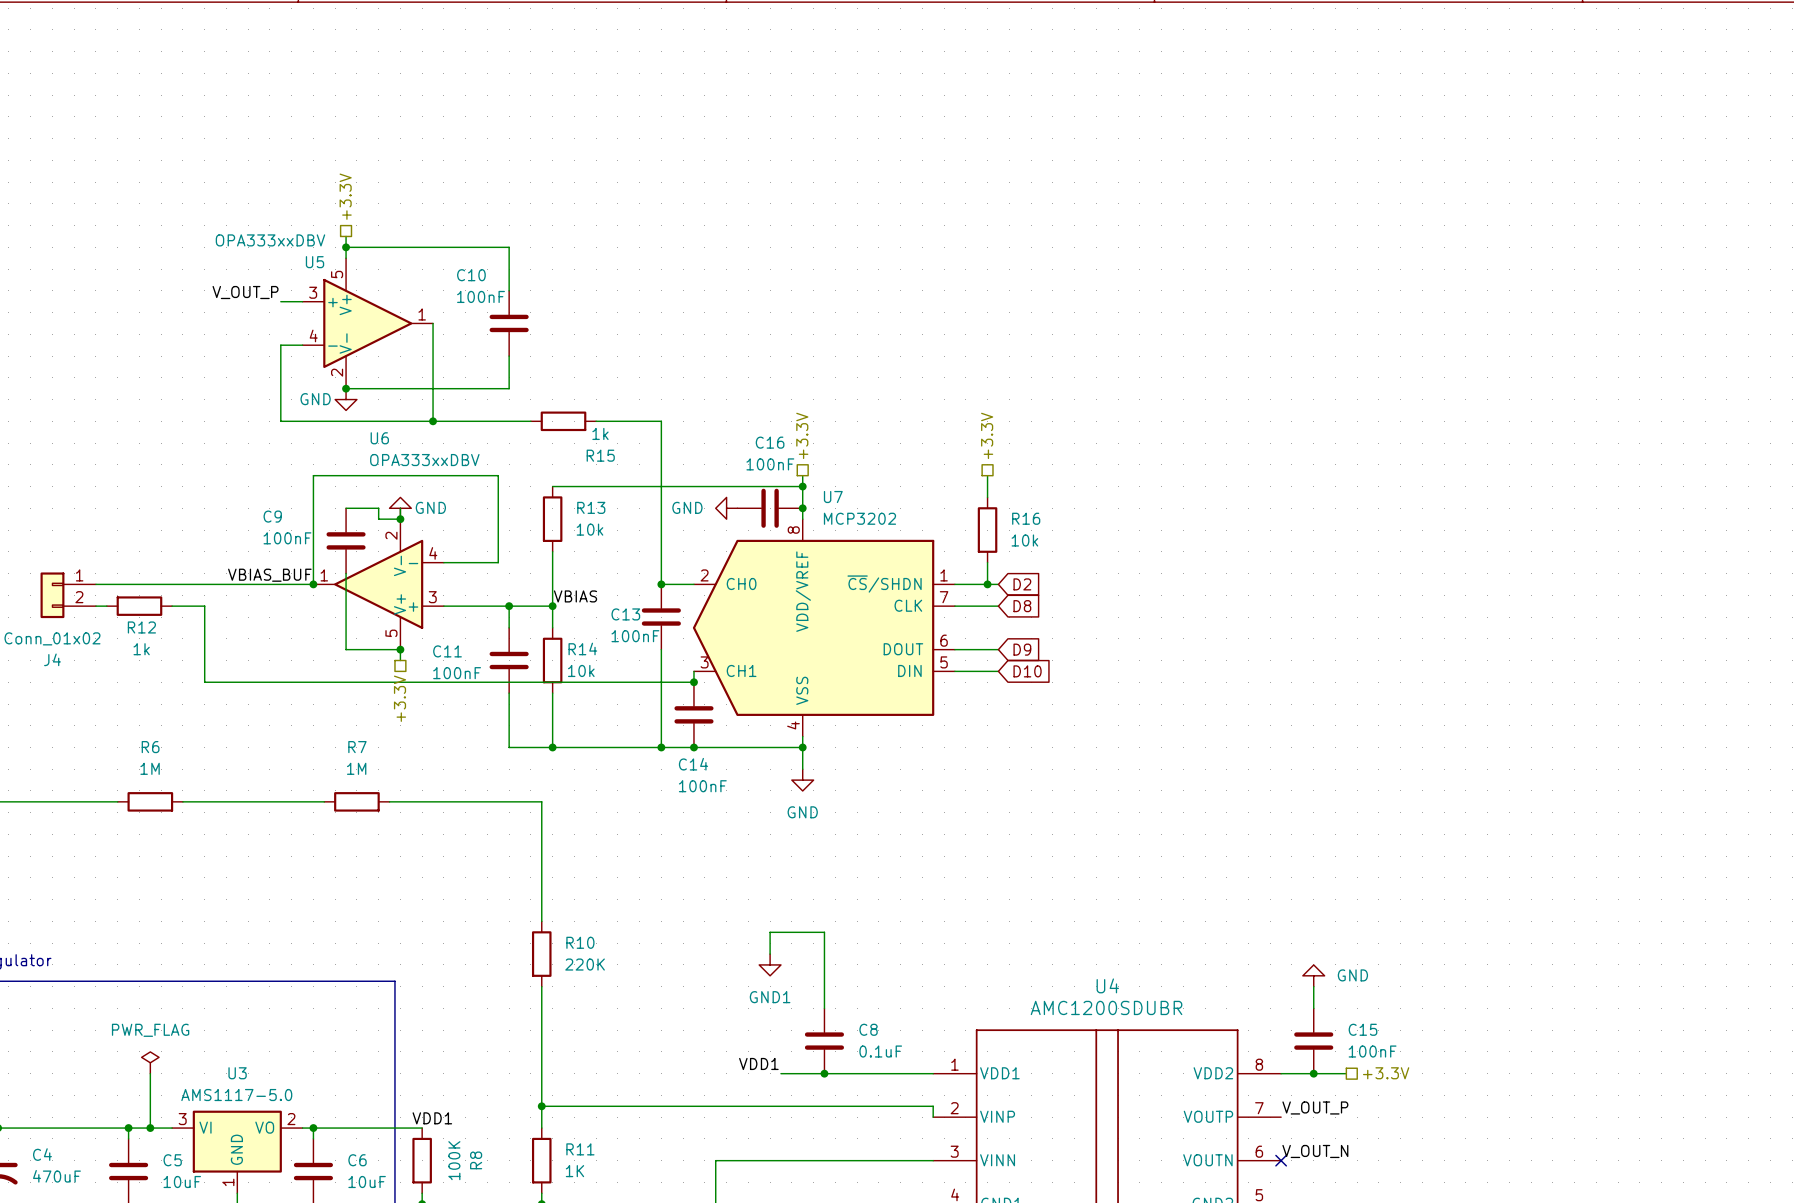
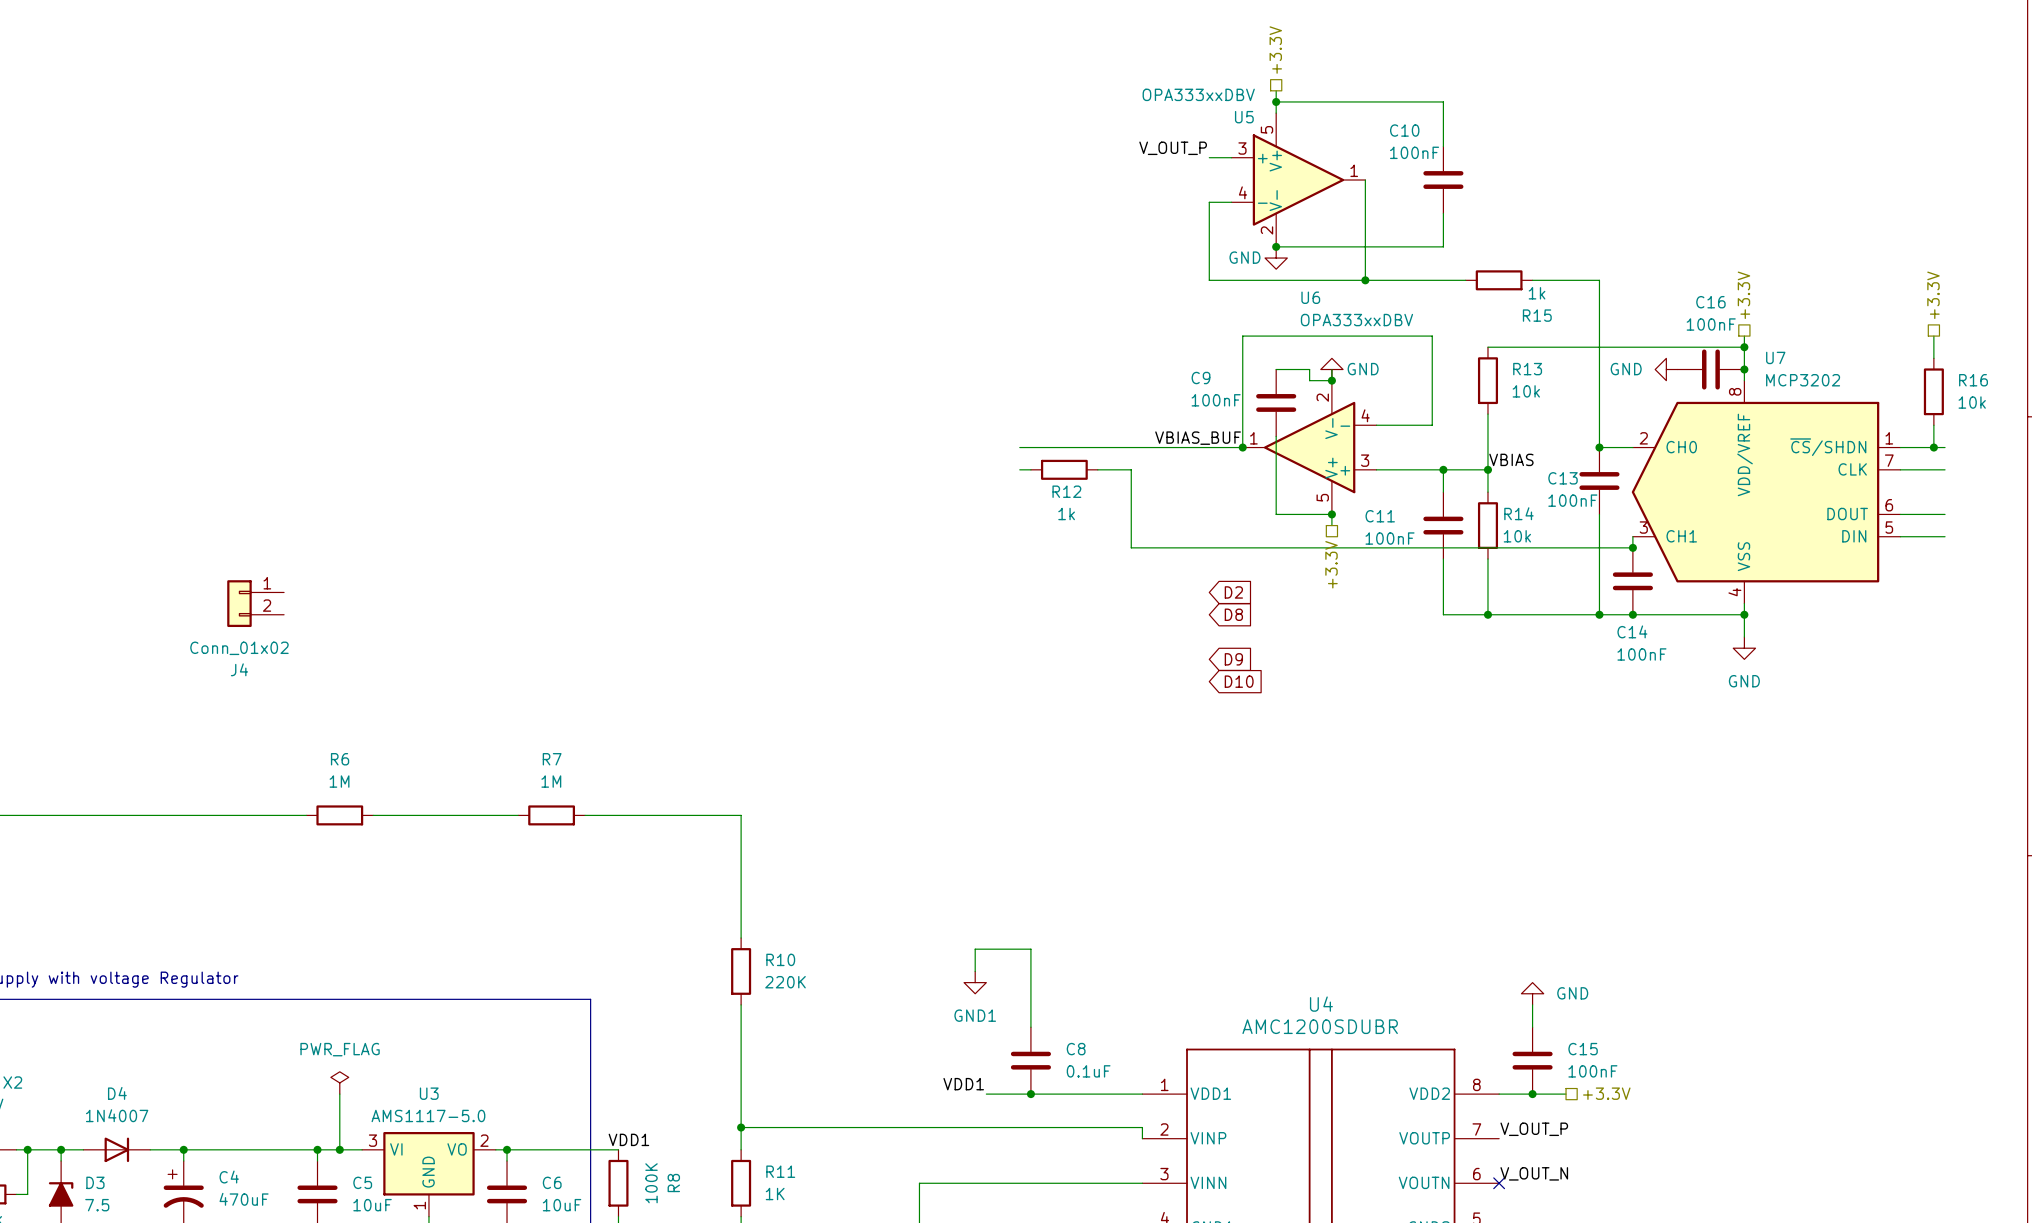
hierarchical label: none -> +3.3V (1275, 50)
wire: none -> (1276, 90) (1276, 113)
wire: none -> (1276, 101) (1443, 101) (1443, 146)
junction: none -> (1276, 101)
label: none -> V_OUT_P (1173, 148)
wire: none -> (1209, 157) (1231, 157)
wire: none -> (1365, 180) (1365, 280)
hierarchical label: +3.3V (345, 196) -> none
wire: none -> (1231, 202) (1209, 202) (1209, 280) (1465, 280)
wire: none -> (1443, 213) (1443, 246) (1276, 246)
wire: (346, 236) (346, 258) -> none
wire: (346, 247) (509, 247) (509, 290) -> none
junction: (346, 247) -> none
junction: none -> (1276, 246)
power symbol: none -> GND (1276, 258)
junction: none -> (1365, 280)
wire: none -> (1532, 280) (1599, 280) (1599, 447) (1632, 447)
label: V_OUT_P (245, 292) -> none
hierarchical label: none -> +3.3V (1743, 295)
hierarchical label: none -> +3.3V (1933, 295)
wire: (280, 301) (302, 301) -> none
U5 position: (367, 323) -> (1298, 180)
wire: (433, 323) (433, 421) -> none
C10 position: (509, 323) -> (1443, 180)
wire: none -> (1744, 336) (1744, 380)
wire: none -> (1933, 336) (1933, 358)
wire: (302, 345) (280, 345) (280, 421) (530, 421) -> none
wire: none -> (1487, 347) (1744, 347)
junction: none -> (1744, 347)
wire: (509, 356) (509, 388) (346, 388) -> none
wire: none -> (1276, 369) (1309, 369) (1309, 380) (1331, 380) (1331, 369)
power symbol: none -> GND (1331, 369)
power symbol: none -> GND (1666, 369)
junction: none -> (1744, 369)
junction: none -> (1331, 380)
junction: (346, 388) -> none
power symbol: GND (346, 399) -> none
wire: none -> (1487, 414) (1487, 492)
junction: (433, 421) -> none
R15 position: (563, 421) -> (1499, 280)
wire: (596, 421) (661, 421) (661, 584) (693, 584) -> none
wire: none -> (1376, 425) (1432, 425) (1432, 336) (1242, 336) (1242, 447) (1019, 447)
wire: none -> (1933, 425) (1933, 447)
wire: none -> (1276, 436) (1276, 514) (1331, 514) (1331, 525)
label: none -> VBIAS_BUF (1198, 438)
hierarchical label: +3.3V (802, 435) -> none
hierarchical label rotation: 0° (987, 435) -> 180° (1331, 564)
hierarchical label position: +3.3V (987, 435) -> +3.3V (1331, 564)
junction: none -> (1242, 447)
junction: none -> (1599, 447)
wire: none -> (1900, 447) (1945, 447)
junction: none -> (1933, 447)
label: none -> VBIAS (1511, 459)
wire: none -> (1019, 469) (1030, 469)
wire: none -> (1097, 469) (1131, 469) (1131, 547) (1632, 547) (1632, 536)
wire: none -> (1376, 469) (1487, 469)
wire: none -> (1443, 469) (1443, 492)
junction: none -> (1443, 469)
junction: none -> (1487, 469)
wire: none -> (1900, 469) (1945, 469)
wire: (802, 475) (802, 519) -> none
wire: (987, 475) (987, 497) -> none
wire: (552, 486) (802, 486) -> none
junction: (802, 486) -> none
wire: (346, 508) (378, 508) (378, 519) (400, 519) (400, 508) -> none
power symbol: GND (400, 508) -> none
power symbol: GND (726, 508) -> none
C16 position: (770, 508) -> (1710, 369)
junction: (802, 508) -> none
junction: none -> (1331, 514)
wire: none -> (1599, 514) (1599, 614)
wire: none -> (1900, 514) (1945, 514)
junction: (400, 519) -> none
R13 position: (552, 519) -> (1487, 380)
R16 position: (987, 530) -> (1933, 391)
wire: none -> (1900, 536) (1945, 536)
C9 position: (346, 540) -> (1276, 402)
junction: none -> (1632, 547)
wire: (552, 551) (552, 627) -> none
wire: none -> (1443, 559) (1443, 614) (1744, 614)
wire: none -> (1487, 559) (1487, 614)
wire: (443, 562) (498, 562) (498, 475) (313, 475) (313, 584) (95, 584) -> none
wire: (987, 562) (987, 584) -> none
wire: (346, 573) (346, 649) (400, 649) (400, 660) -> none
label: VBIAS_BUF (269, 575) -> none
junction: (313, 584) -> none
U6 position: (378, 584) -> (1309, 447)
junction: (661, 584) -> none
wire: (954, 584) (998, 584) -> none
junction: (987, 584) -> none
wire: none -> (1744, 603) (1744, 637)
label: VBIAS (575, 596) -> none
wire: (95, 606) (106, 606) -> none
R12 position: (139, 606) -> (1064, 469)
wire: (172, 606) (204, 606) (204, 682) (693, 682) (693, 671) -> none
wire: (443, 606) (552, 606) -> none
wire: (509, 606) (509, 627) -> none
junction: (509, 606) -> none
junction: (552, 606) -> none
wire: (954, 606) (998, 606) -> none
junction: none -> (1487, 614)
junction: none -> (1599, 614)
junction: none -> (1632, 614)
junction: none -> (1744, 614)
C13 position: (661, 617) -> (1599, 480)
U7 position: (823, 627) -> (1766, 492)
power symbol: none -> GND (1744, 648)
junction: (400, 649) -> none
wire: (661, 649) (661, 747) -> none
wire: (954, 649) (998, 649) -> none
C11 position: (509, 660) -> (1443, 525)
R14 position: (552, 660) -> (1487, 525)
wire: (954, 671) (998, 671) -> none
junction: (693, 682) -> none
wire: (509, 693) (509, 747) (802, 747) -> none
wire: (552, 693) (552, 747) -> none
hierarchical label: +3.3V (400, 698) -> none
C14 position: (693, 714) -> (1632, 581)
wire: (802, 736) (802, 769) -> none
junction: (552, 747) -> none
junction: (661, 747) -> none
junction: (693, 747) -> none
junction: (802, 747) -> none
power symbol: GND (802, 780) -> none

